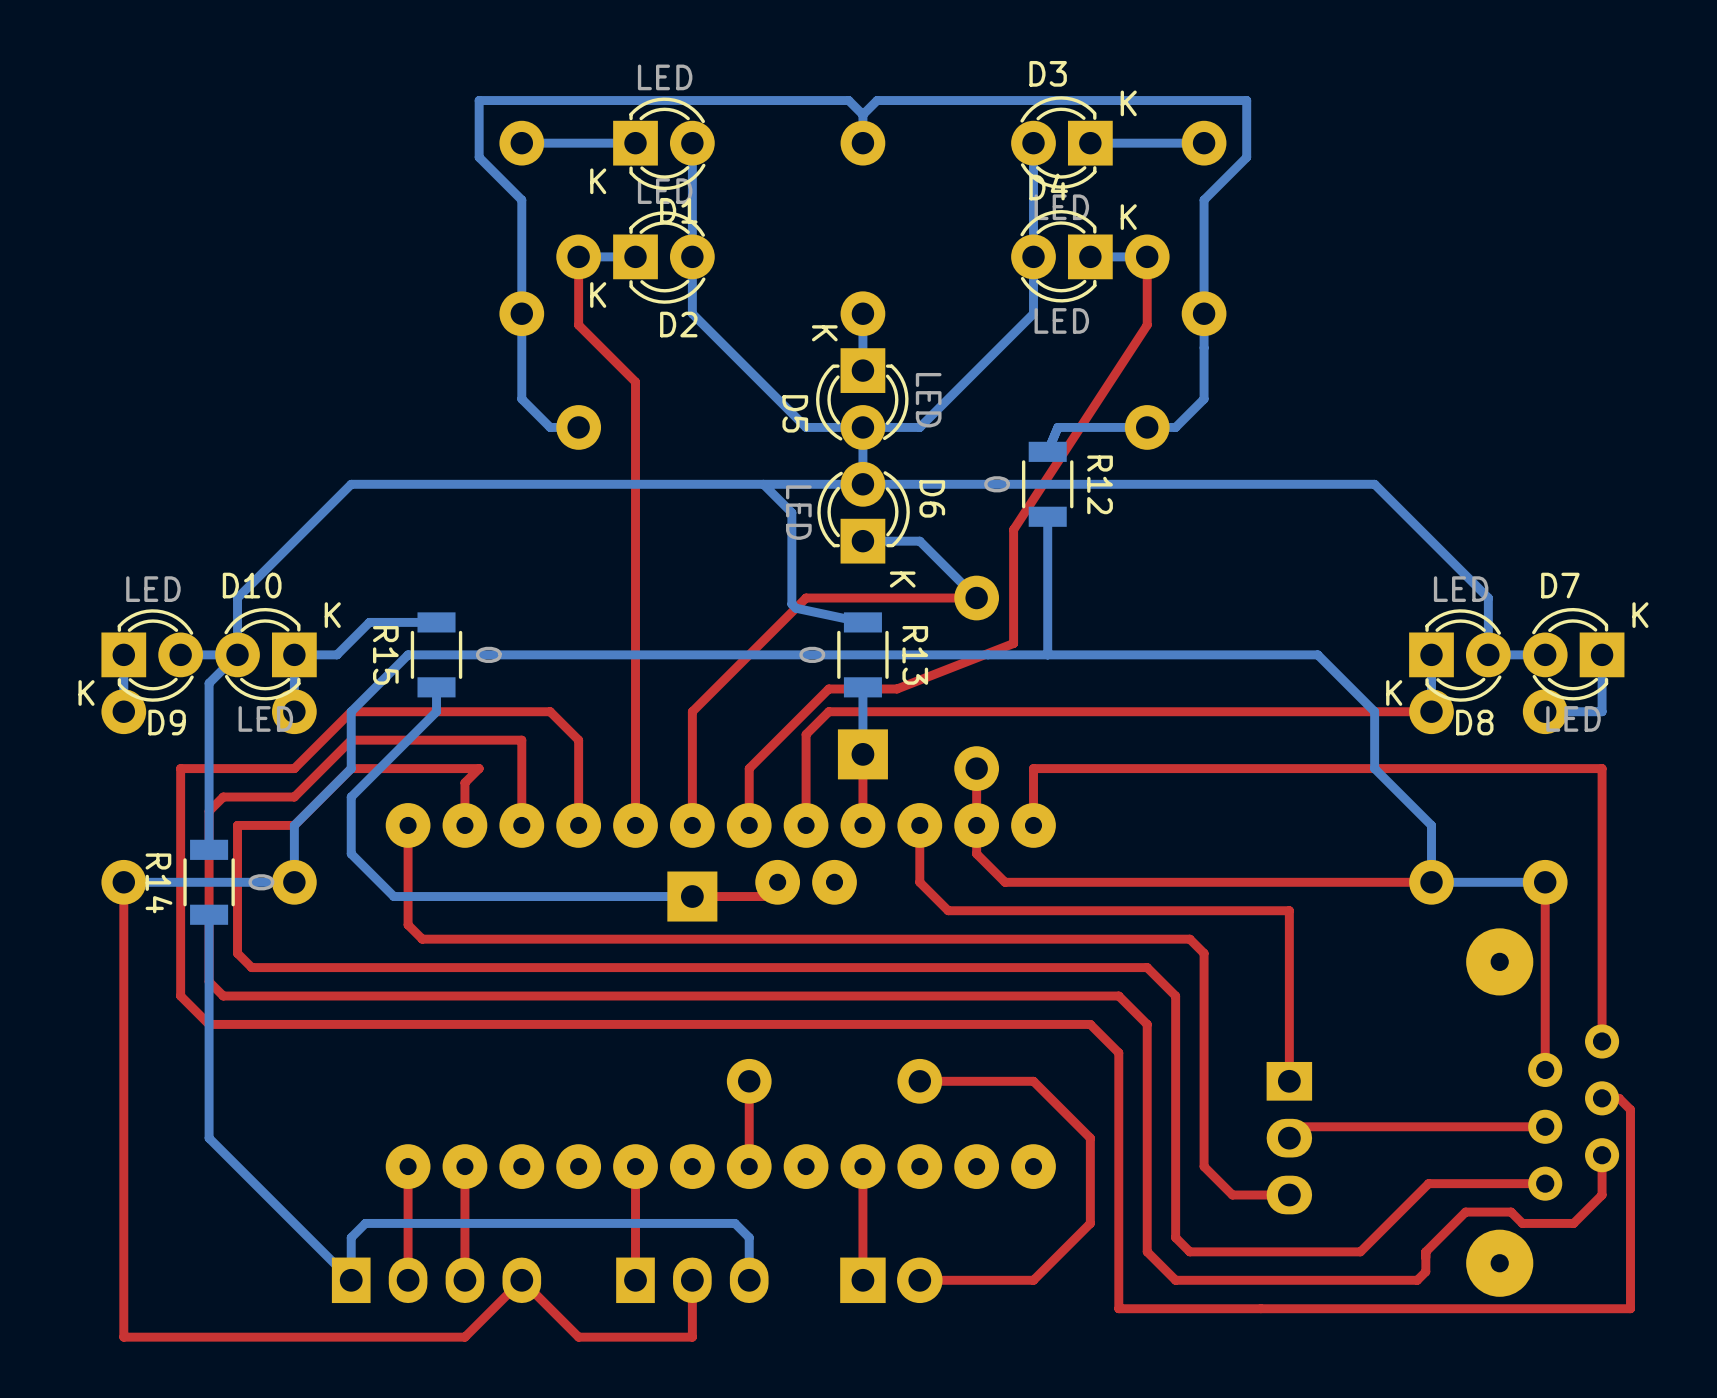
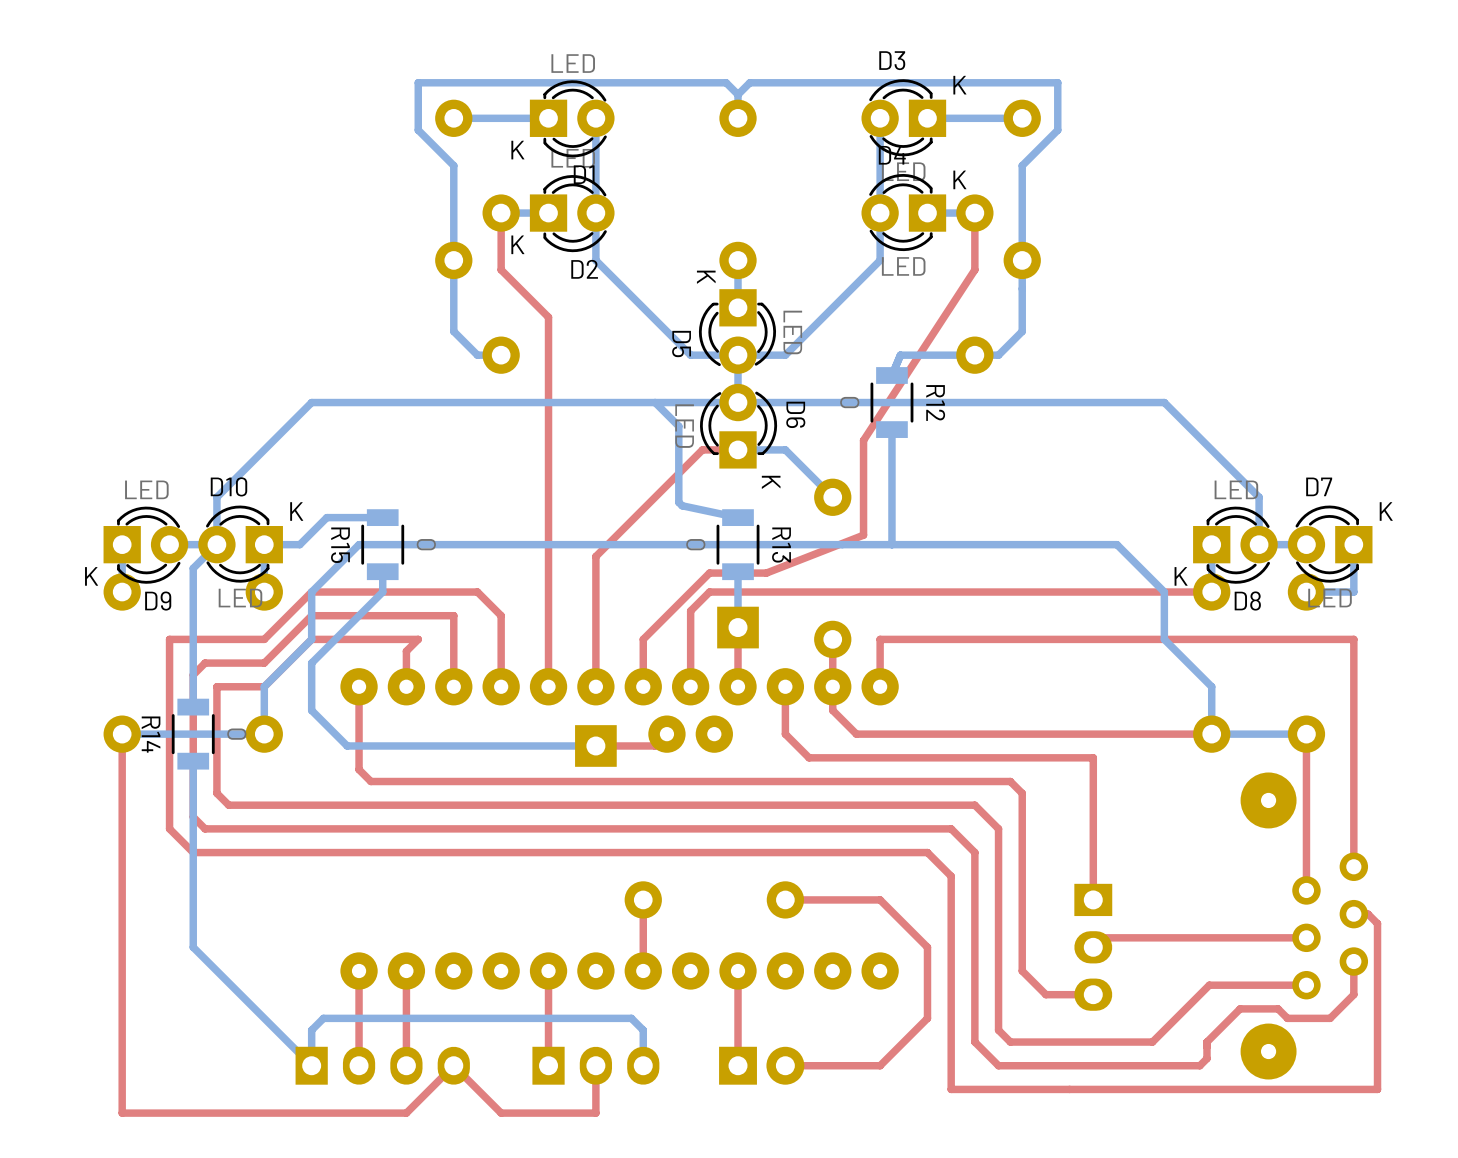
top track: (976, 598) (806, 598) (692, 711) -> (738, 449) (702, 449) (595, 556) (595, 592)

